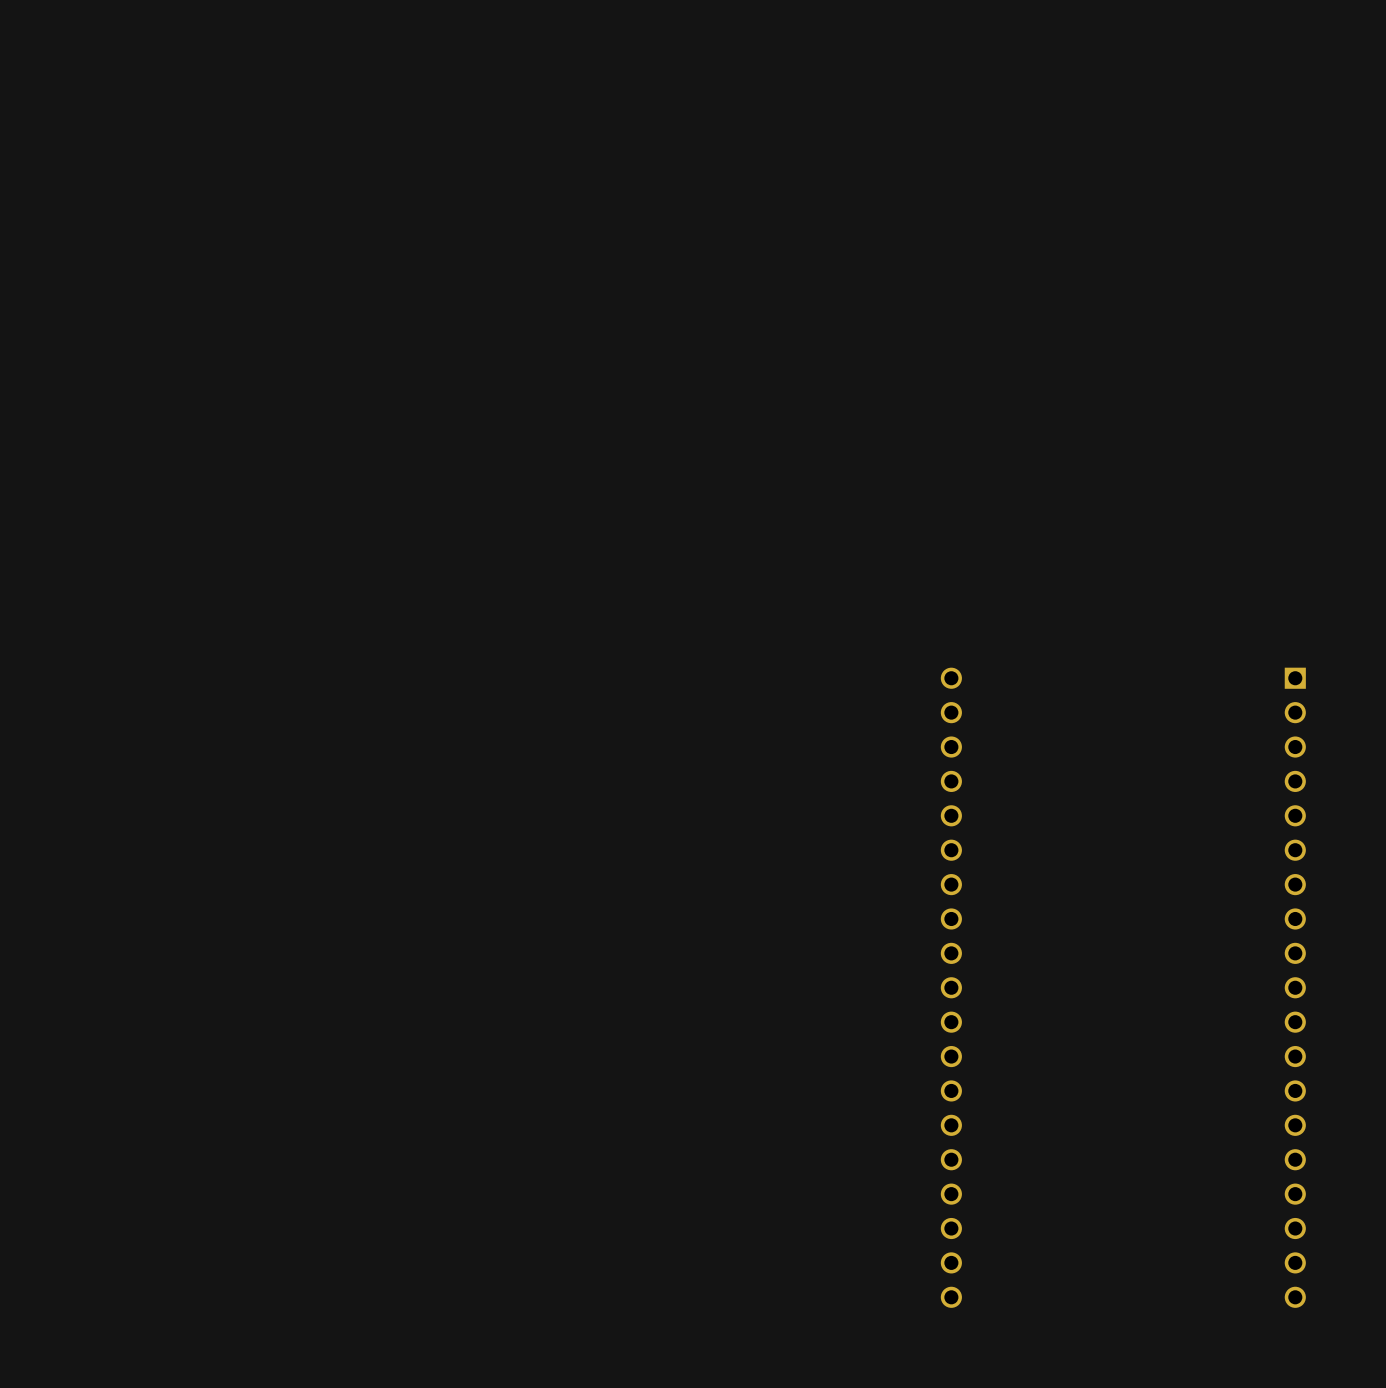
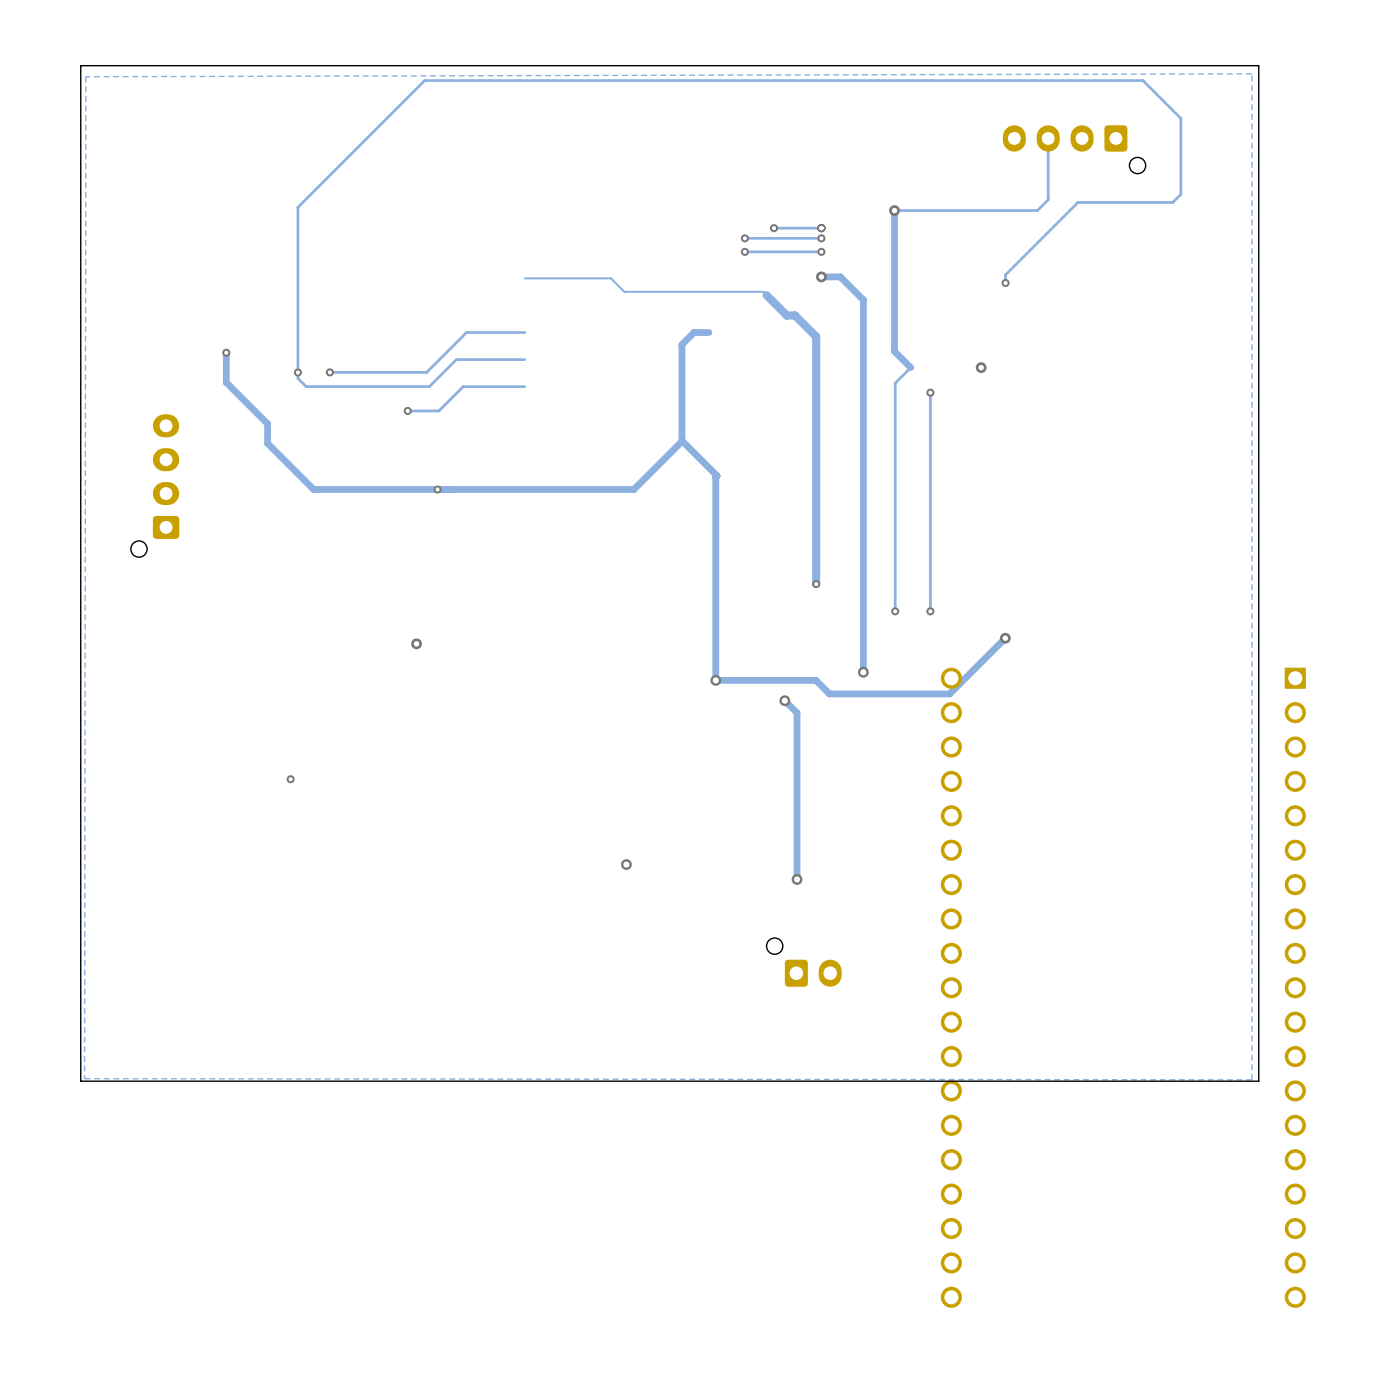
board edge: none -> (1258, 65) (80, 65) (80, 1081) (1258, 1081) (1258, 65)
zone outline: none -> (1251, 73) (1251, 1079) (84, 1078) (85, 76) (1251, 73)
track: none -> (1048, 138) (1048, 199) (1037, 210) (894, 210) (894, 351) (910, 367) (895, 383) (895, 611)
part: none -> (1074, 149)
via: none -> (894, 210)
via: none -> (774, 228)
track: none -> (821, 228) (774, 228)
via: none -> (821, 228)
via: none -> (744, 238)
track: none -> (821, 238) (744, 238)
via: none -> (821, 238)
via: none -> (744, 251)
track: none -> (821, 251) (744, 251)
via: none -> (821, 251)
track: none -> (821, 276) (840, 276) (863, 299) (863, 672)
via: none -> (821, 276)
track: none -> (524, 278) (610, 278) (624, 291) (763, 291) (786, 315) (794, 315) (816, 336) (816, 584)
track: none -> (1005, 283) (1005, 274) (1077, 202) (1172, 202) (1180, 194) (1180, 118) (1142, 80) (424, 80) (297, 207) (297, 378) (306, 386) (429, 386) (456, 359) (524, 359)
via: none -> (1005, 283)
track: none -> (524, 332) (466, 332) (426, 372) (329, 372)
track: none -> (708, 332) (694, 332) (681, 344) (681, 441) (633, 489) (313, 489) (267, 443) (267, 423) (226, 382) (226, 352)
via: none -> (226, 352)
via: none -> (981, 367)
via: none -> (297, 372)
via: none -> (329, 372)
track: none -> (524, 386) (463, 386) (438, 410) (407, 410)
track: none -> (930, 392) (930, 611)
via: none -> (930, 392)
via: none -> (407, 410)
track: none -> (681, 440) (717, 475) (715, 680) (815, 680) (829, 693) (949, 693) (1005, 638) (1005, 639)
part: none -> (155, 485)
via: none -> (437, 489)
via: none -> (816, 584)
via: none -> (895, 611)
via: none -> (930, 611)
via: none -> (1005, 638)
via: none -> (416, 643)
via: none -> (863, 672)
via: none -> (715, 680)
track: none -> (784, 700) (797, 712) (797, 879)
via: none -> (784, 700)
via: none -> (290, 779)
via: none -> (626, 864)
via: none -> (797, 879)
part: none -> (804, 962)

